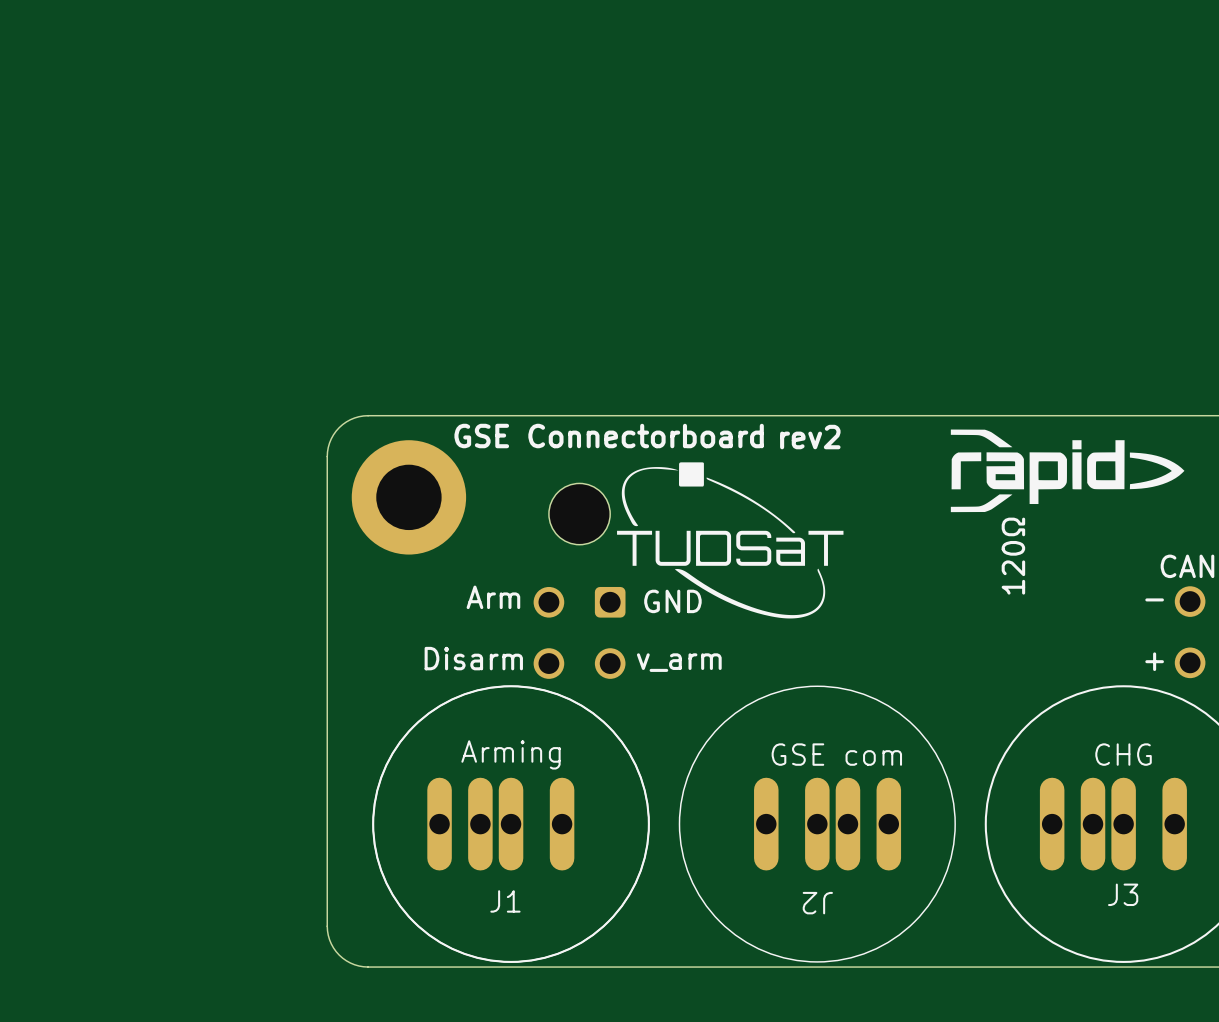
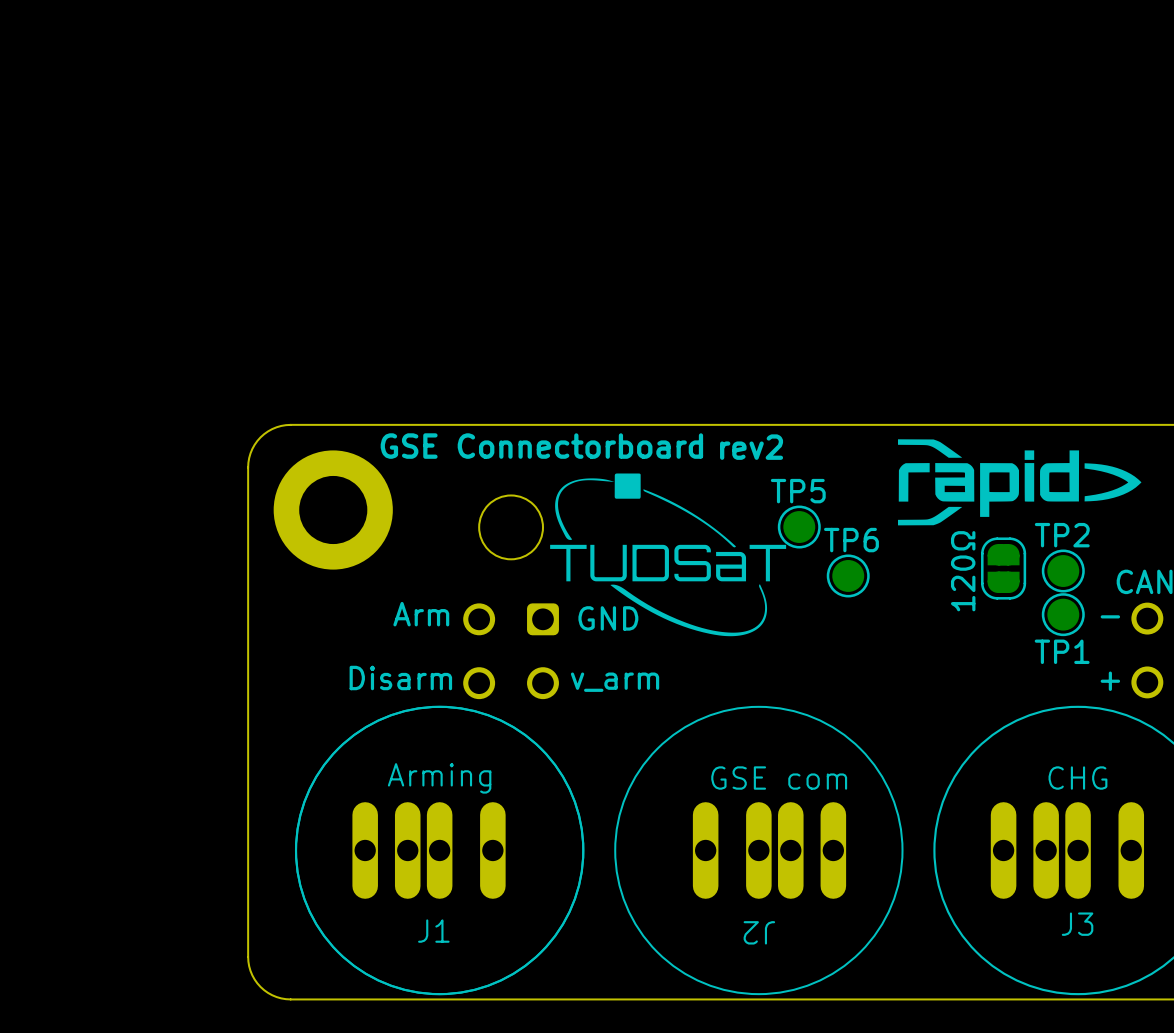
TP5: none -> (799, 527)
part: none -> (1003, 568)
TP2: none -> (1063, 571)
TP6: none -> (848, 575)
TP1: none -> (1063, 614)

